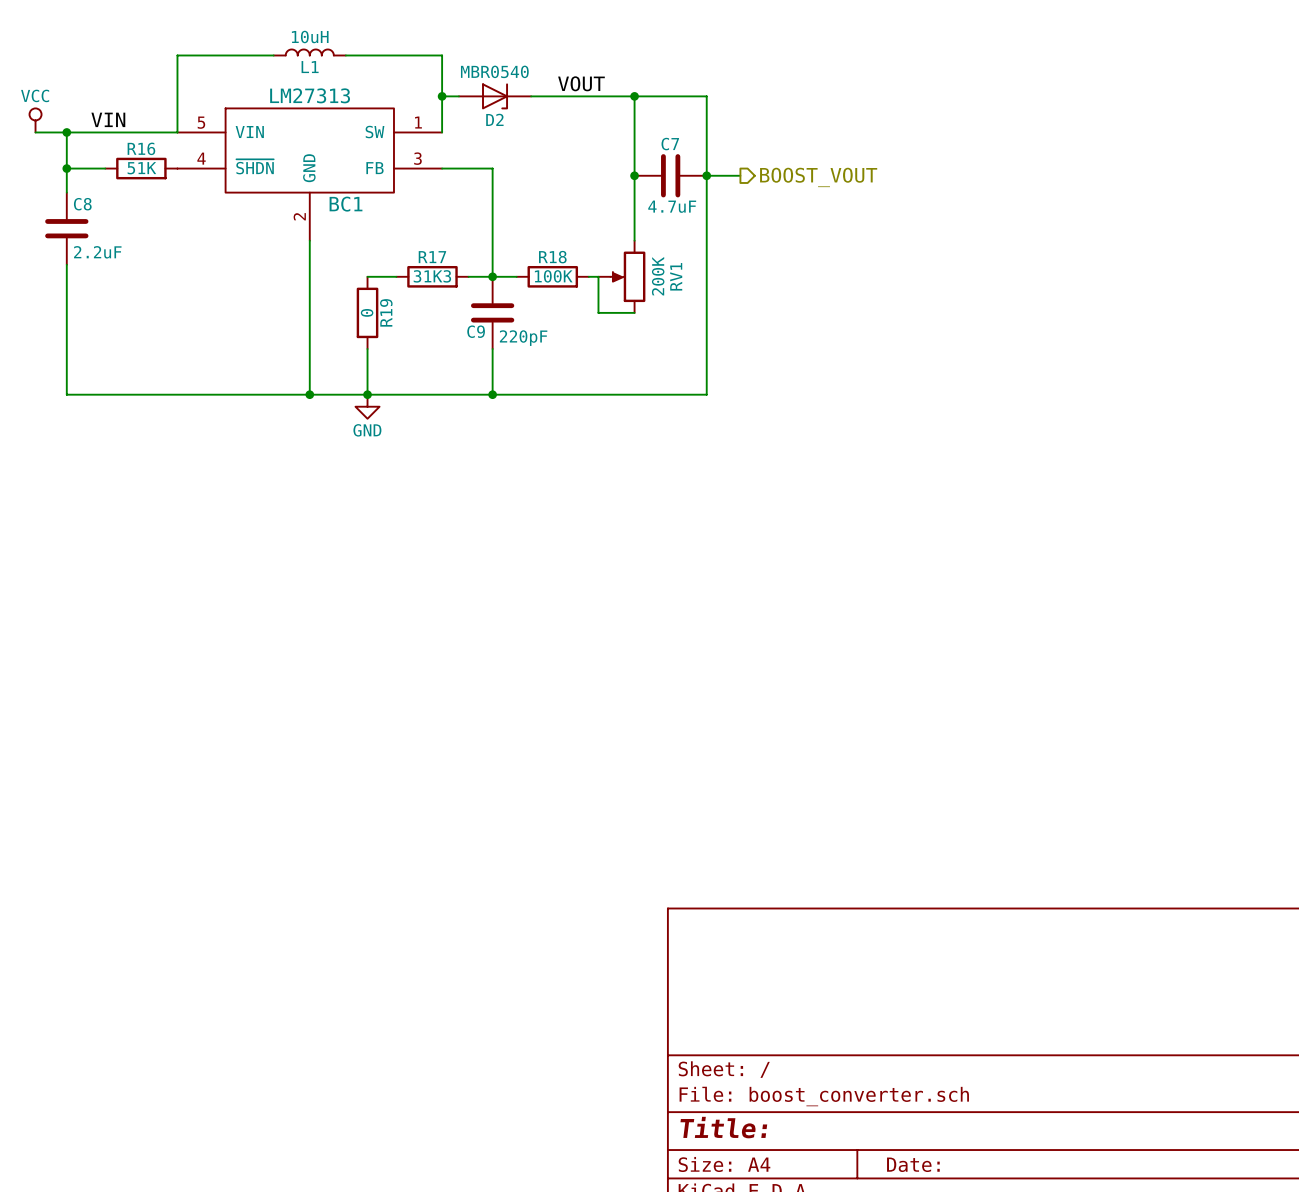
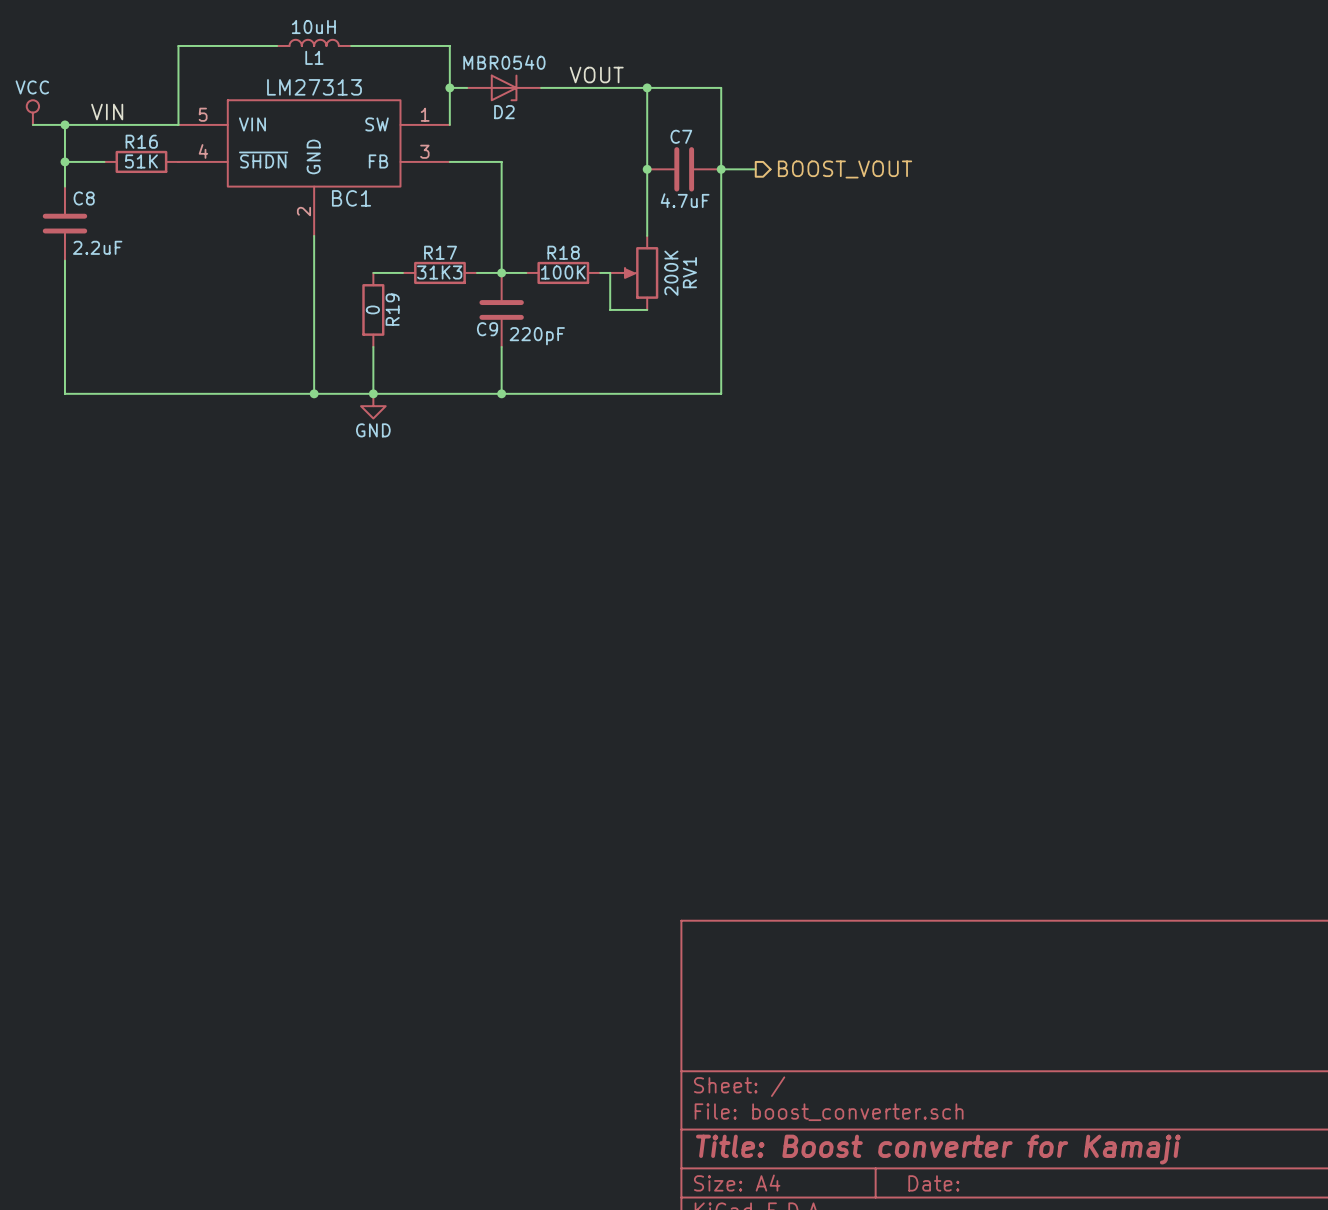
title block: Title: (723, 1127) -> Title: Boost converter for Kamaji (938, 1149)

